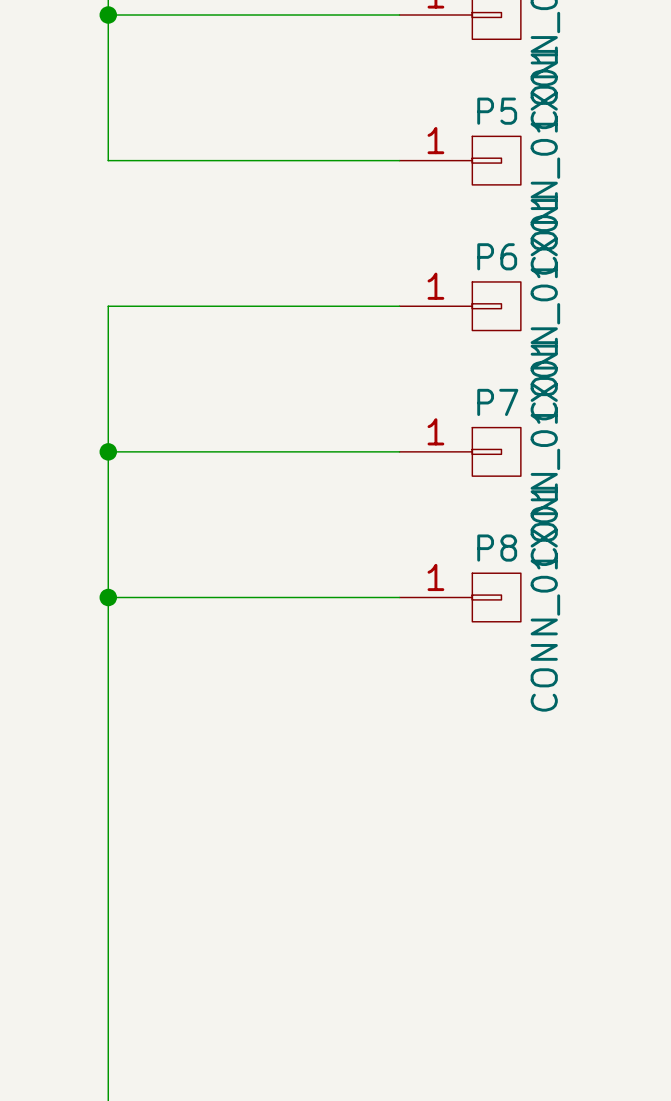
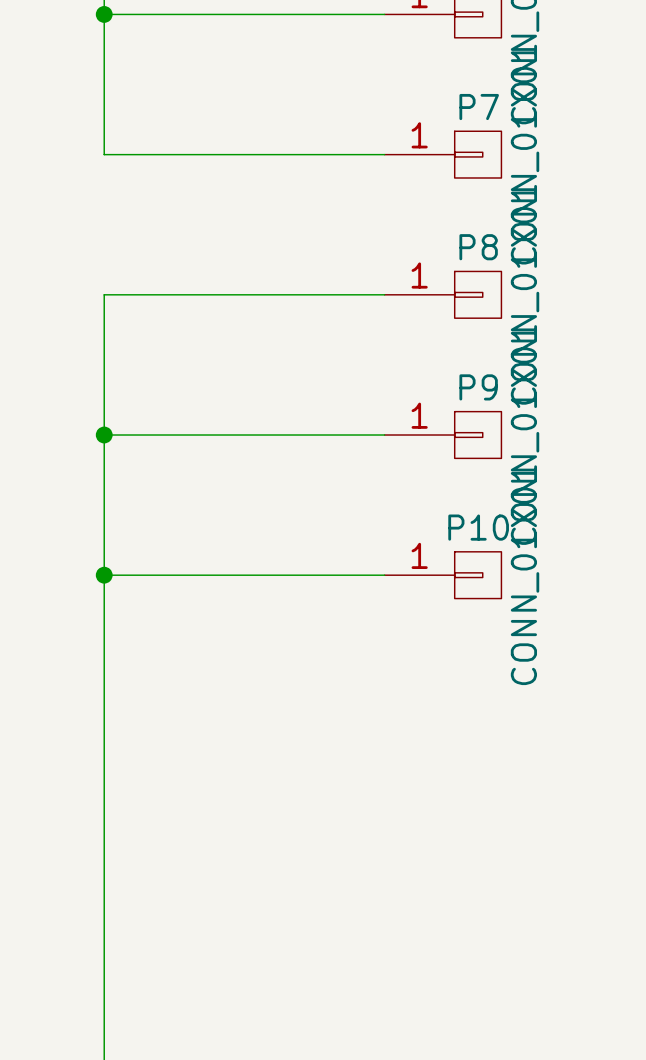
P5 name: P5 (497, 111) -> P7 (479, 107)
P6 name: P6 (497, 256) -> P8 (478, 247)
P7 name: P7 (497, 402) -> P9 (478, 387)
P8 name: P8 (497, 548) -> P10 (478, 527)

